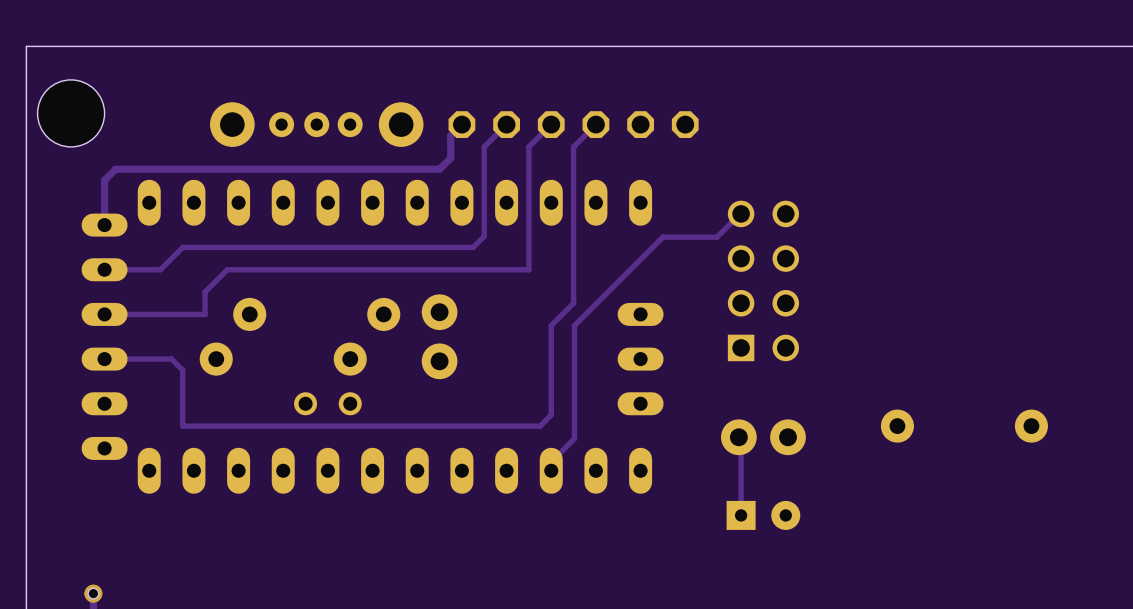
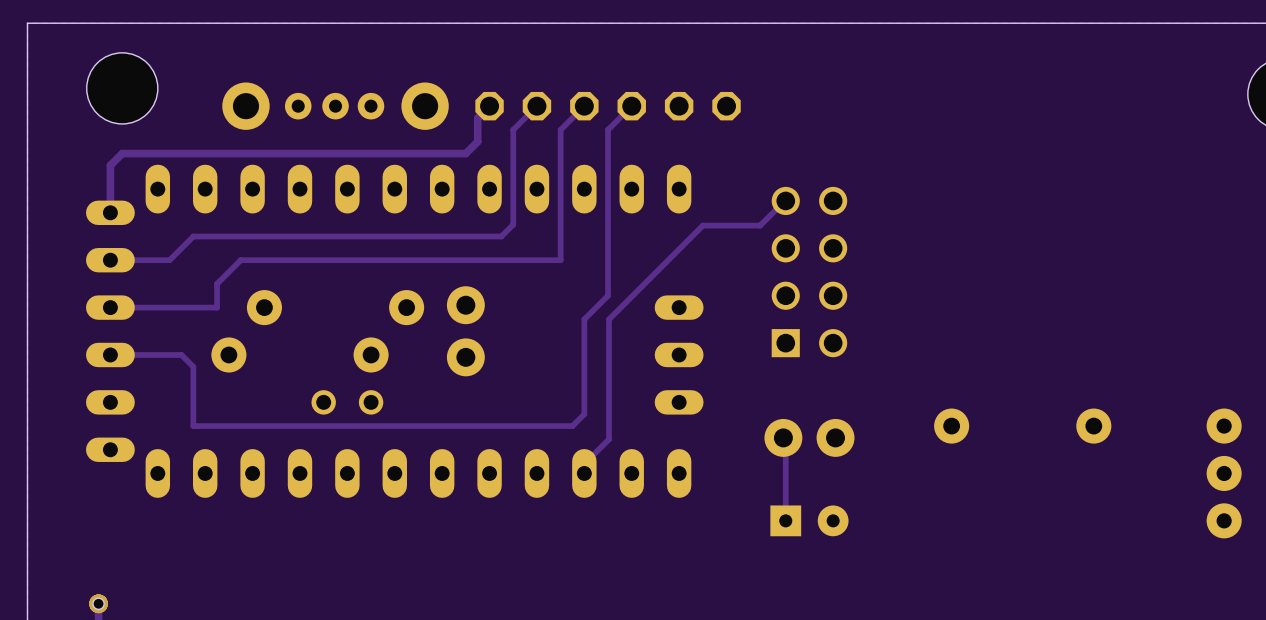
hole position: (71, 113) -> (122, 88)

